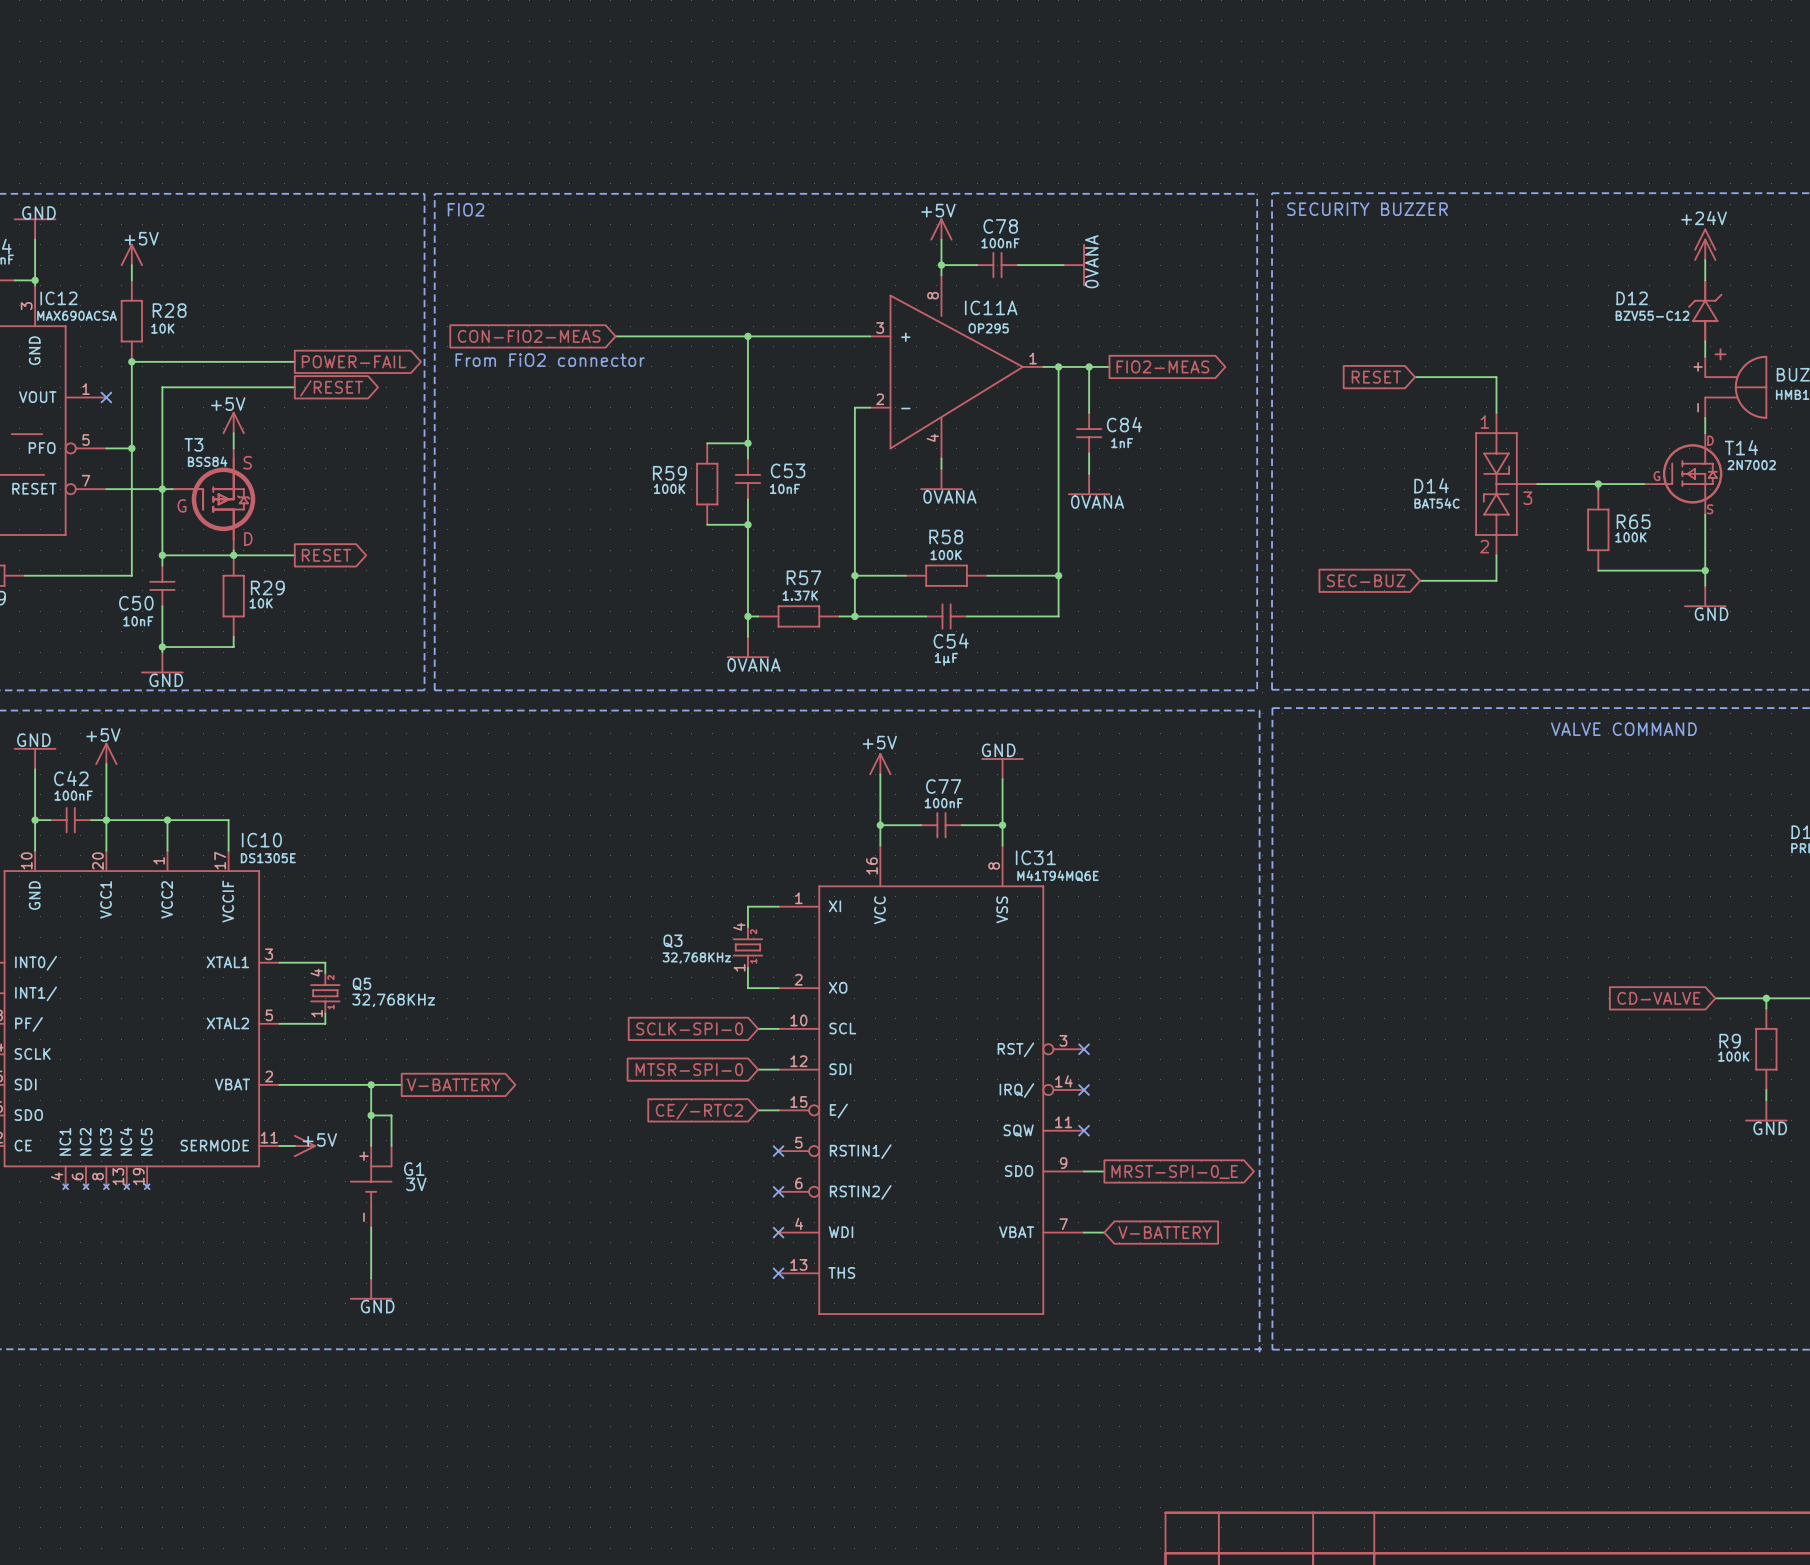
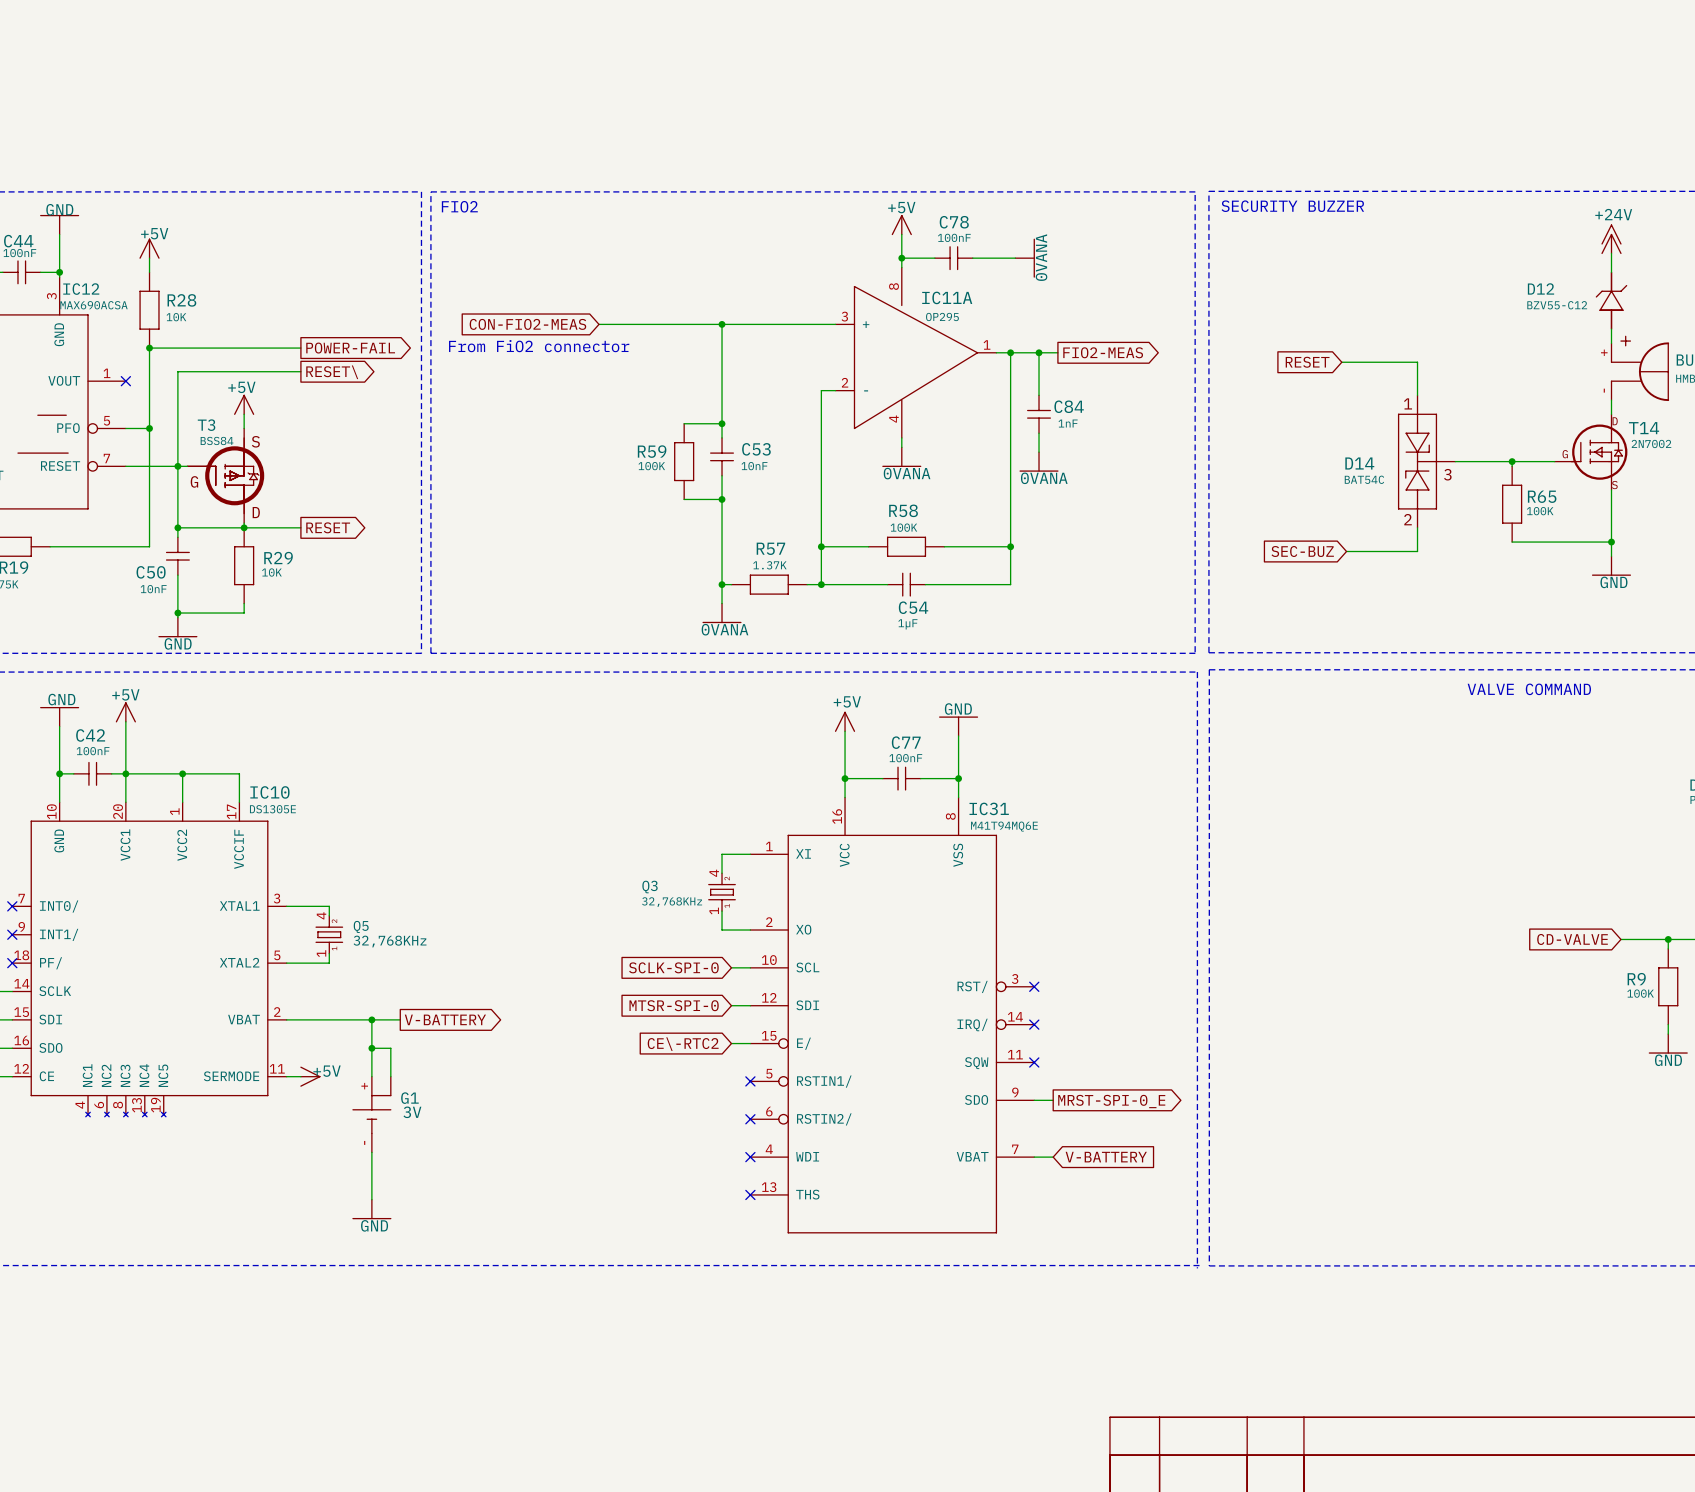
global label: /RESET (331, 388) -> RESET\ (332, 372)
global label: CE/-RTC2 (699, 1111) -> CE\-RTC2 (683, 1044)

